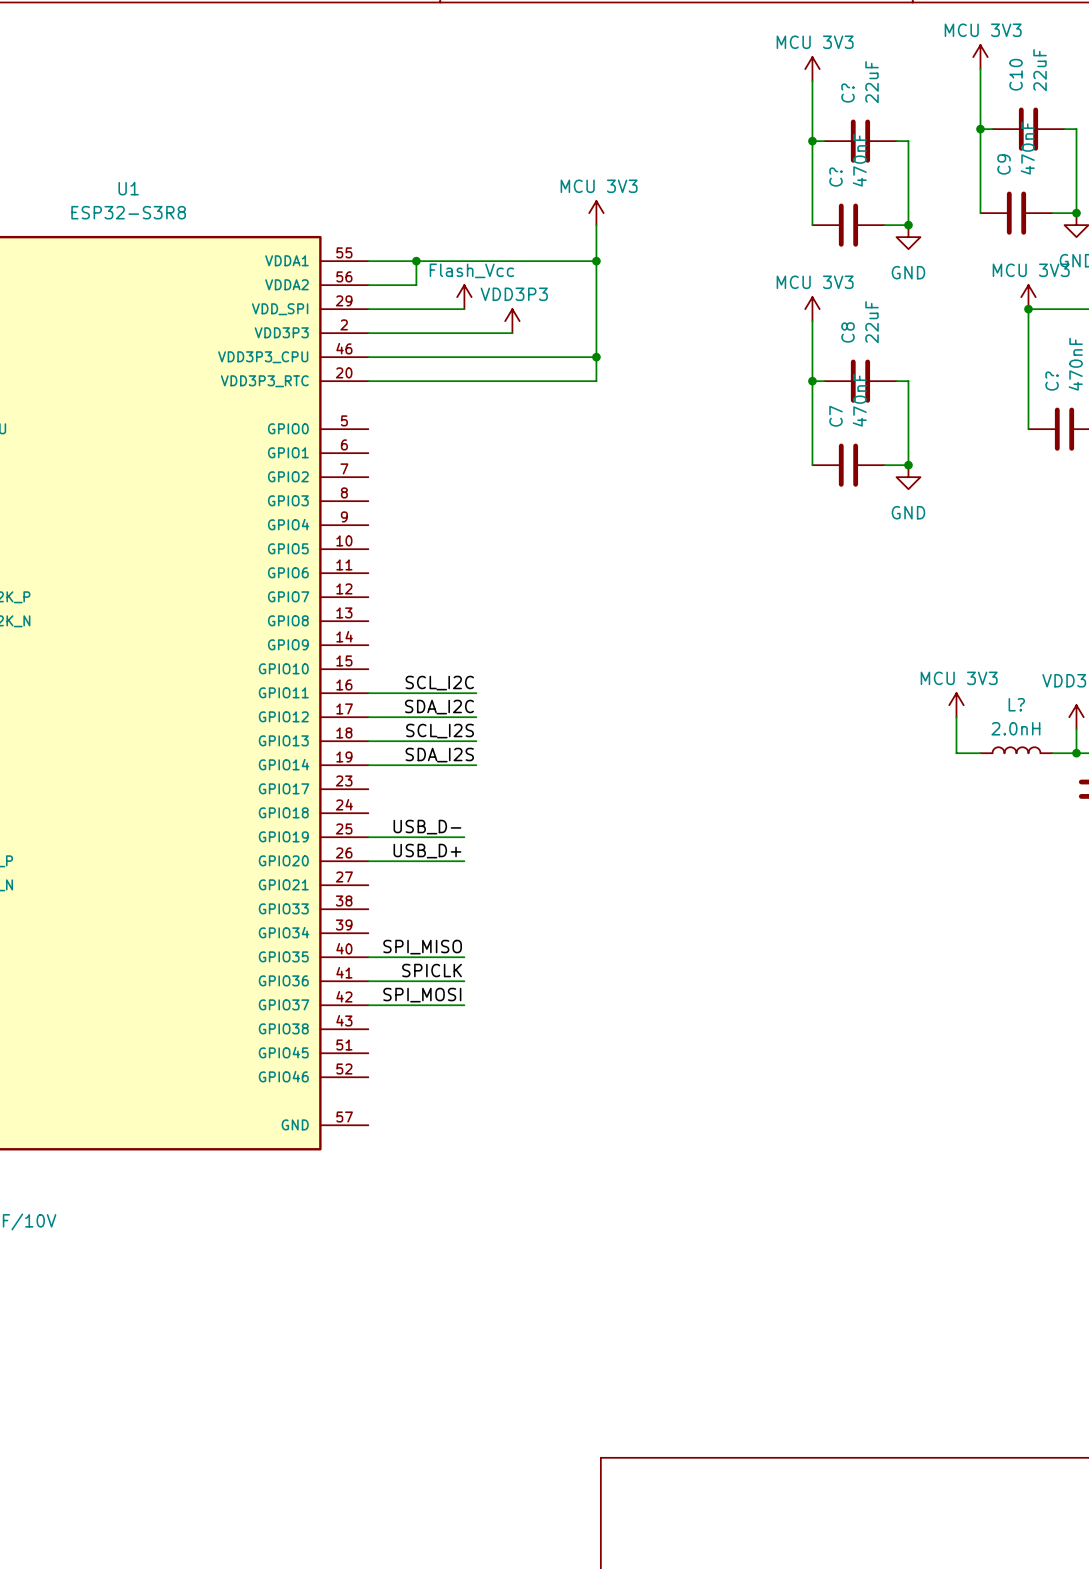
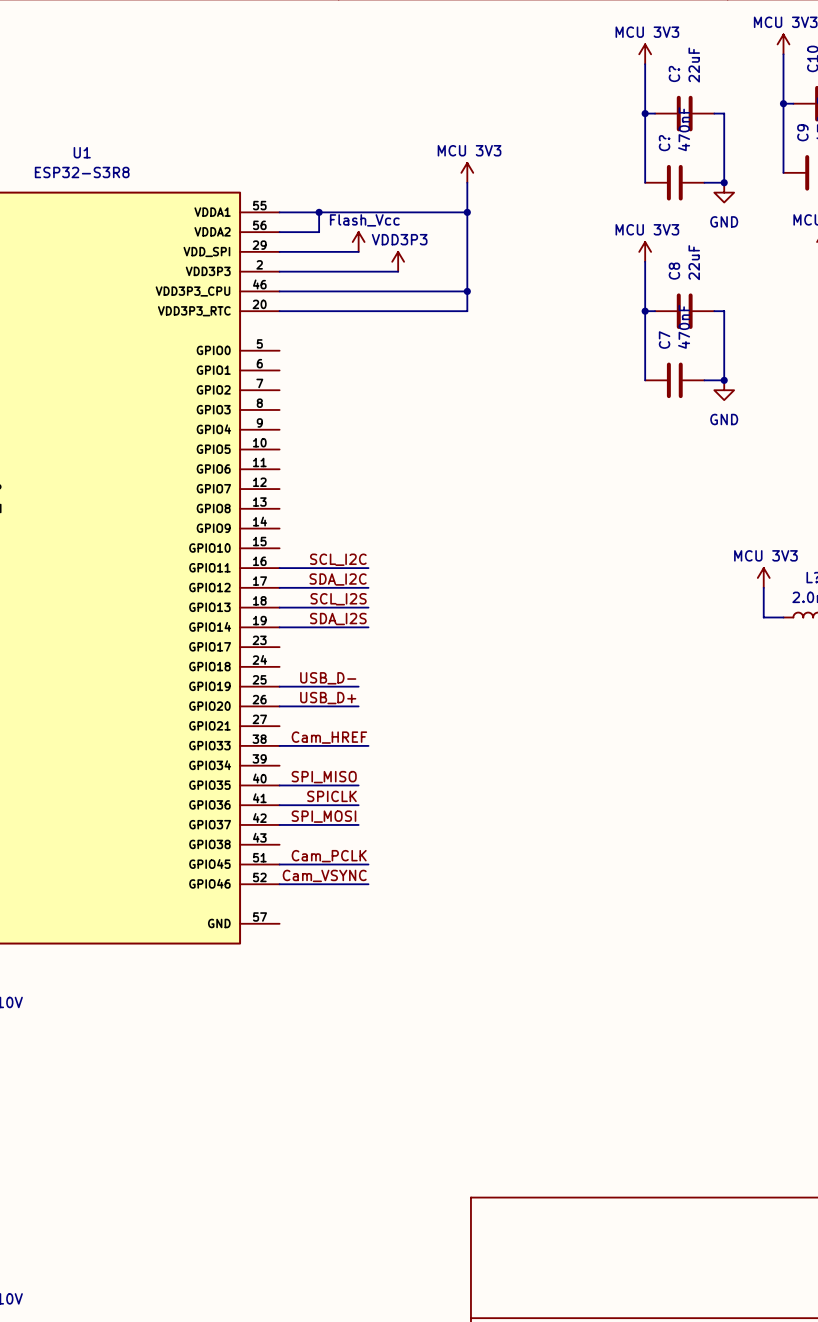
label: none -> Cam_HREF (329, 737)
wire: none -> (279, 745) (368, 745)
label: none -> Cam_PCLK (329, 856)
wire: none -> (279, 864) (368, 864)
label: none -> Cam_VSYNC (324, 875)
wire: none -> (279, 884) (368, 884)

